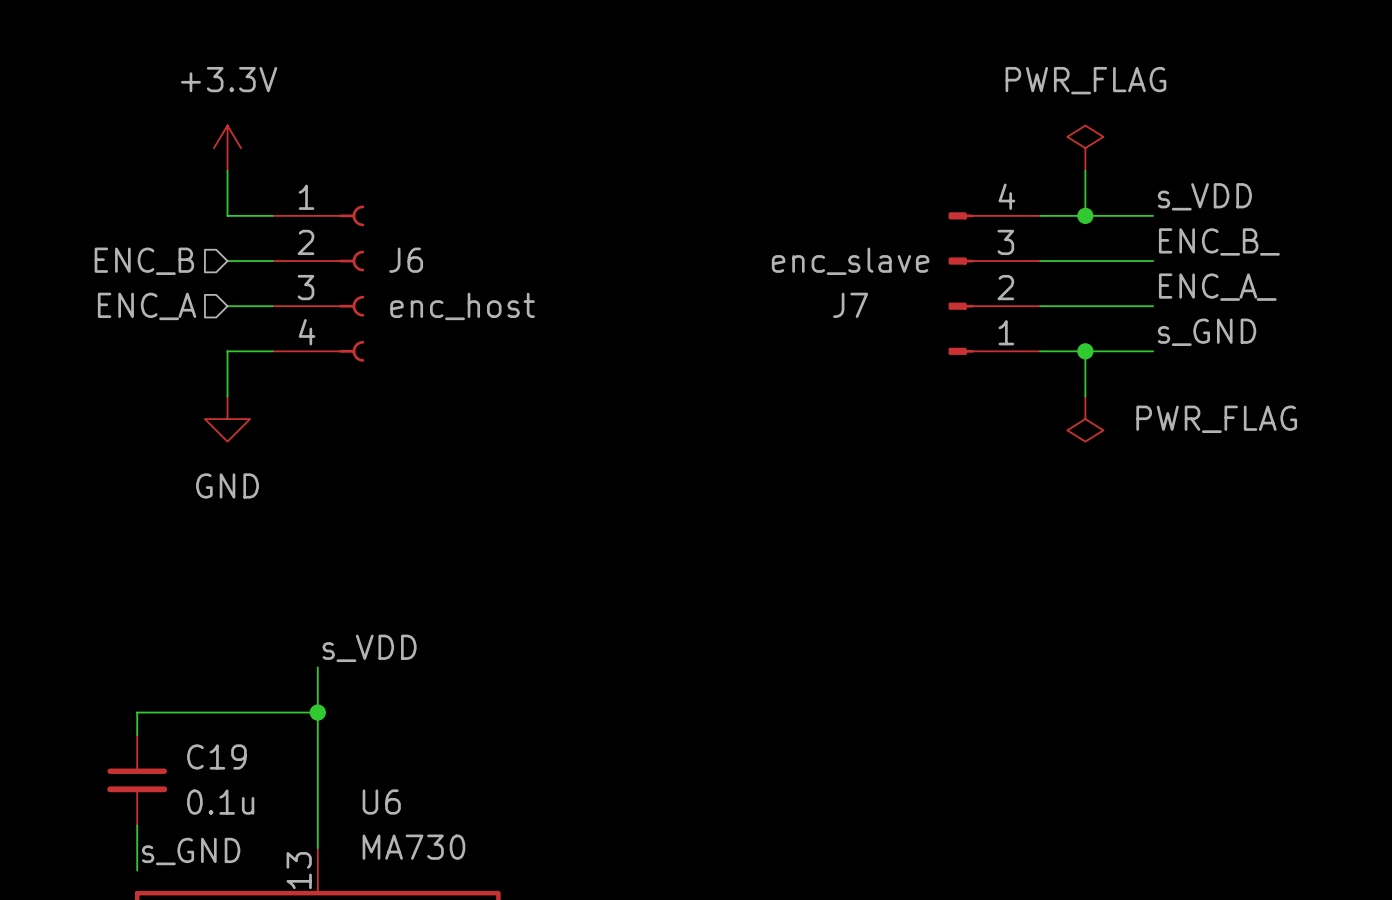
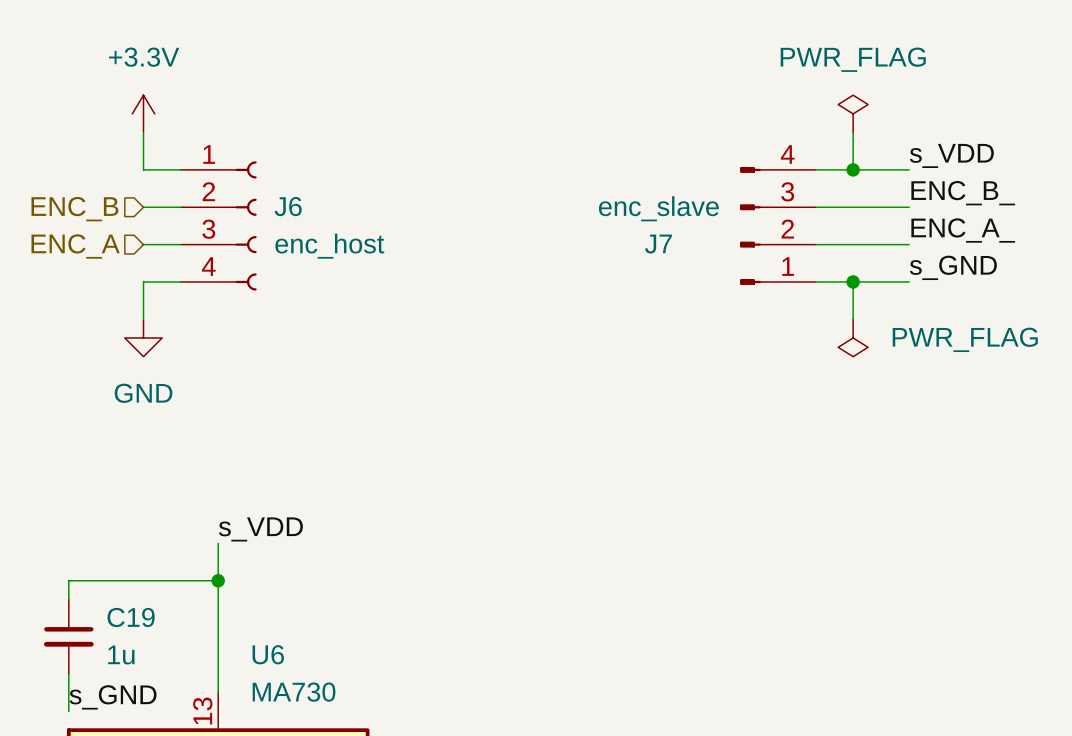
C19 value: 0.1u (220, 802) -> 1u (121, 654)

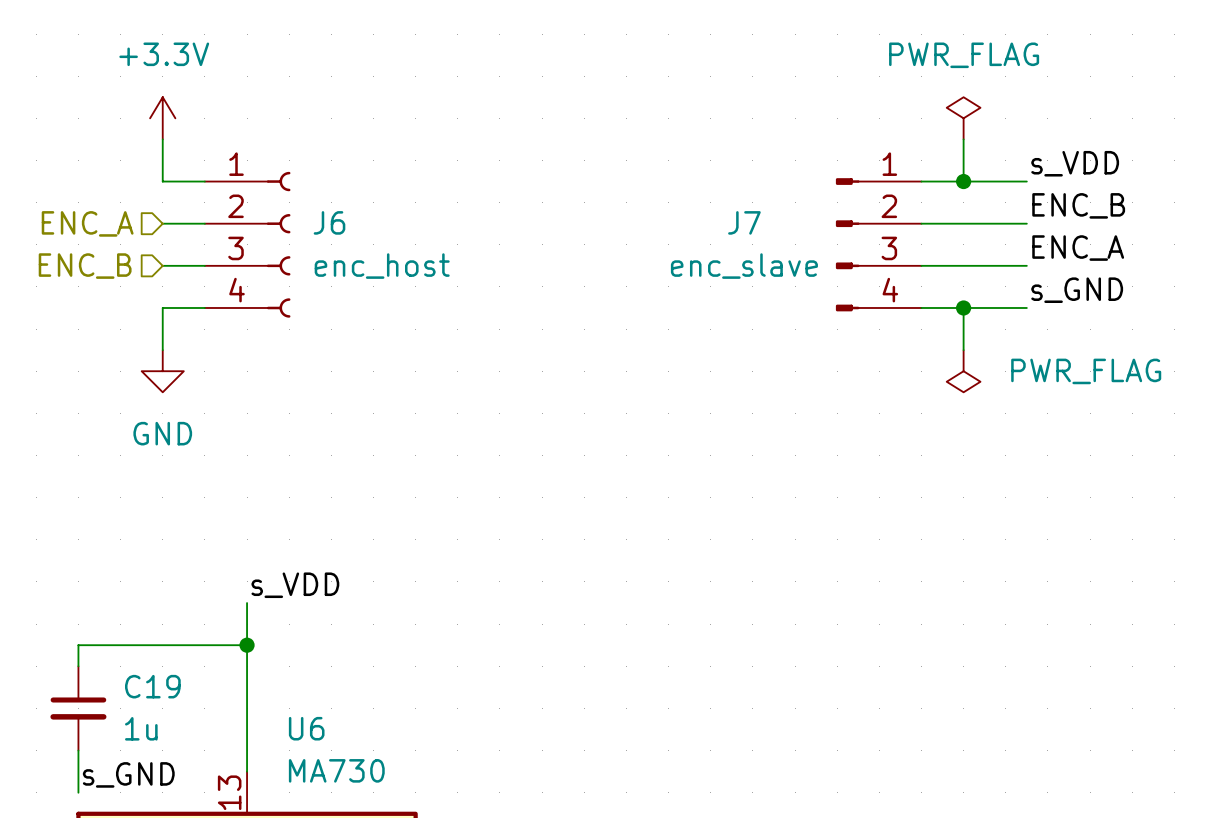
label: ENC_B_ (963, 193) -> ENC_B (1078, 205)
hierarchical label: ENC_B (74, 209) -> ENC_A (87, 223)
J7 flip: as is (750, 225) -> up-down (847, 244)
label: ENC_A_ (963, 230) -> ENC_A (1078, 248)
hierarchical label: ENC_A (75, 246) -> ENC_B (85, 266)

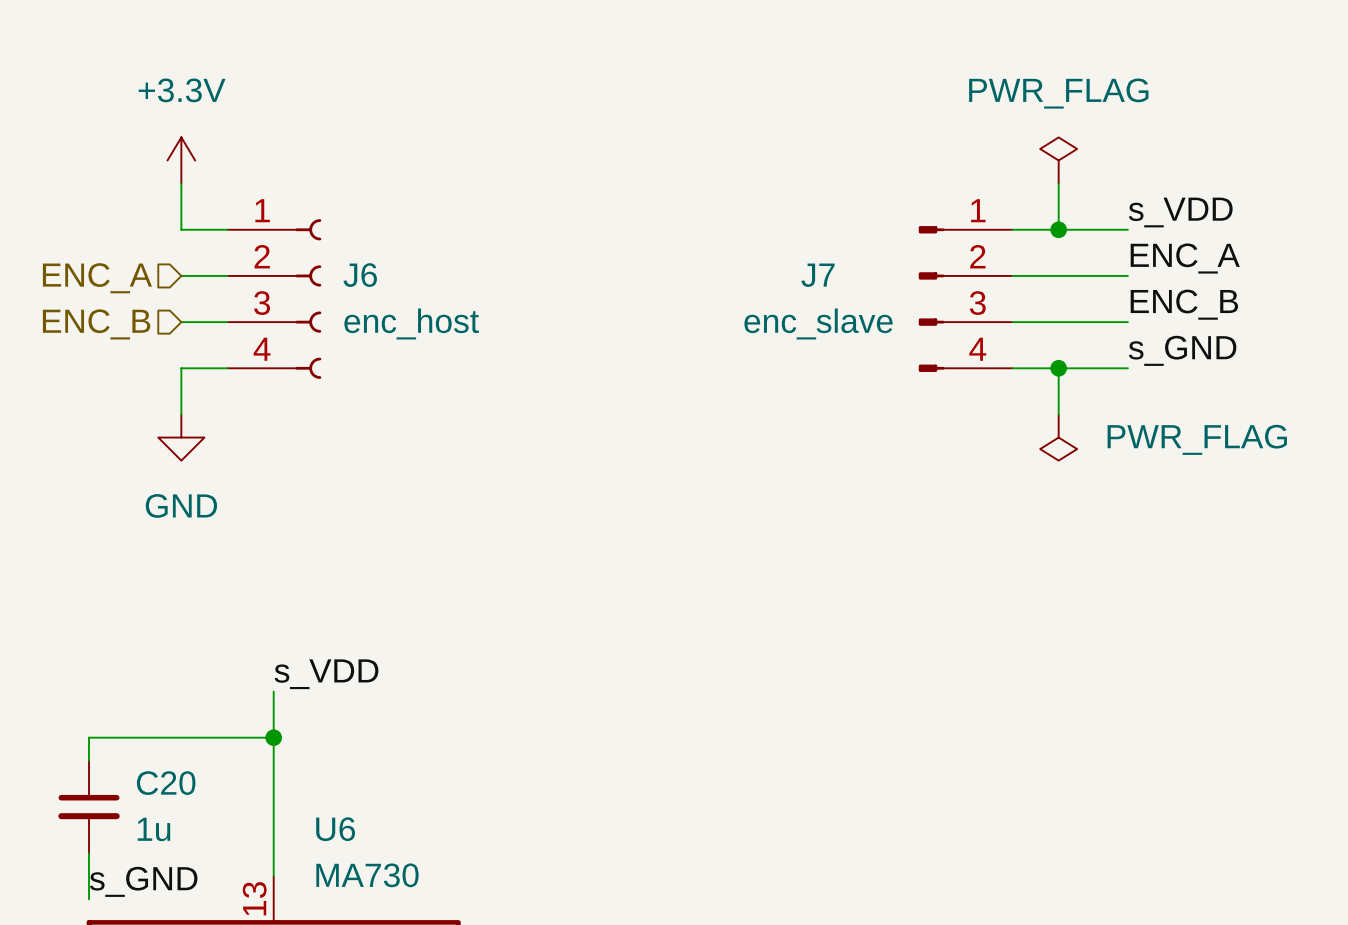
label: ENC_B (1078, 205) -> ENC_A (1185, 258)
label: ENC_A (1078, 248) -> ENC_B (1184, 304)
C19 name: C19 (152, 686) -> C20 (166, 783)

